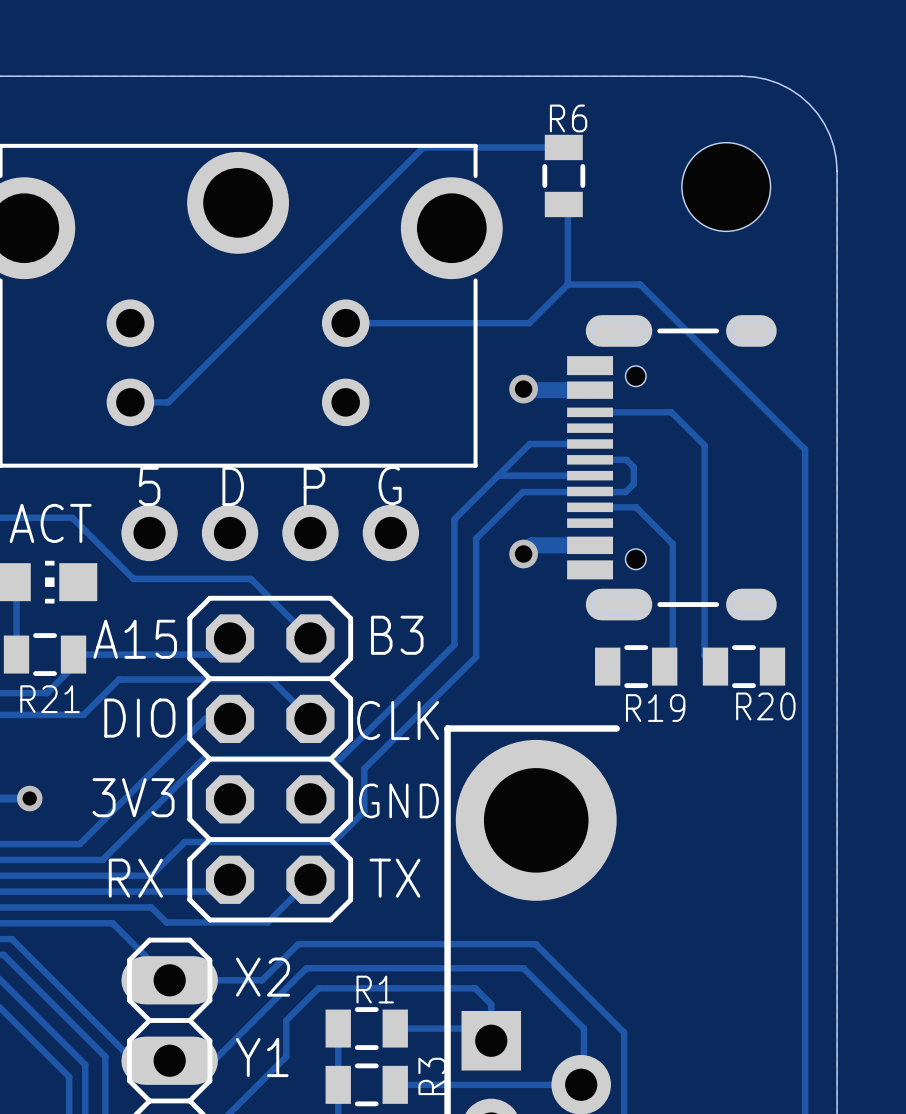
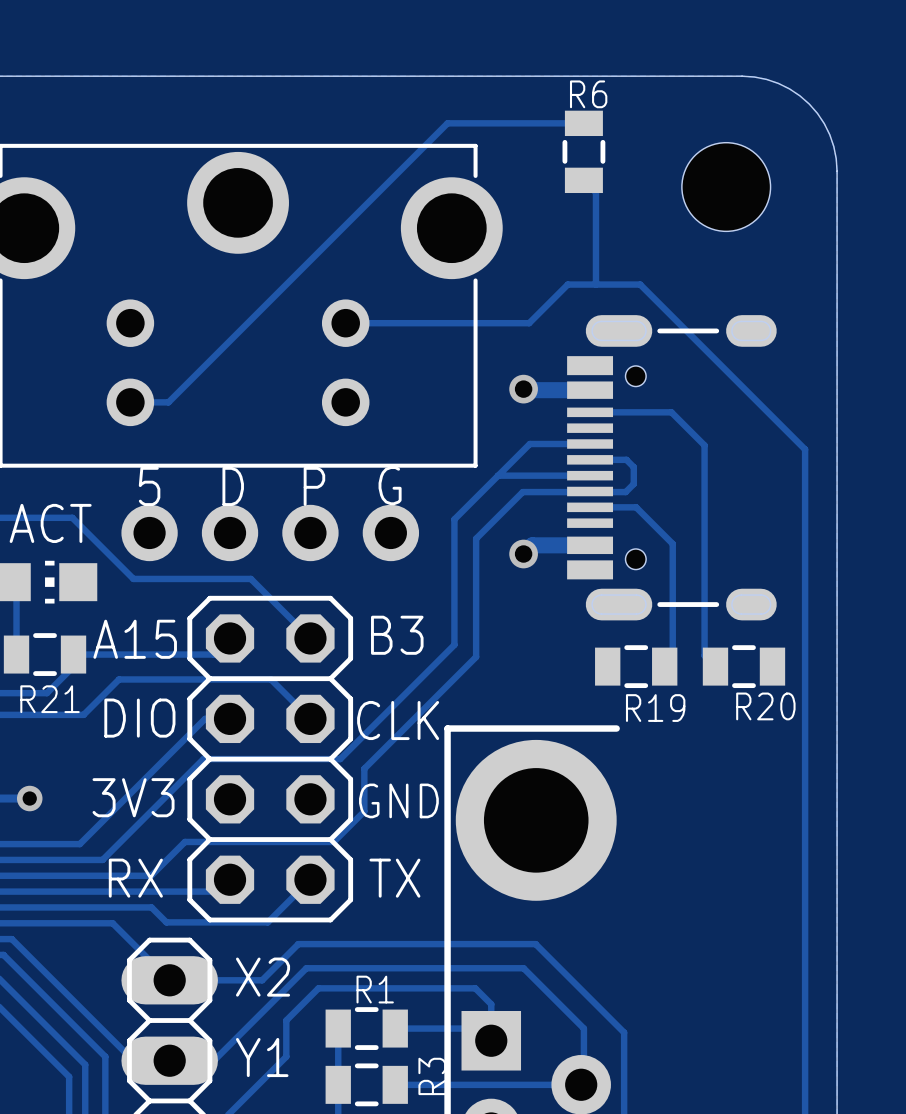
track: (423, 147) (563, 147) -> (423, 147) (447, 123) (583, 123)
R6 position: (563, 175) -> (583, 151)
track: none -> (583, 180) (595, 192) (595, 284)
track: (563, 204) (567, 208) (567, 284) -> none

